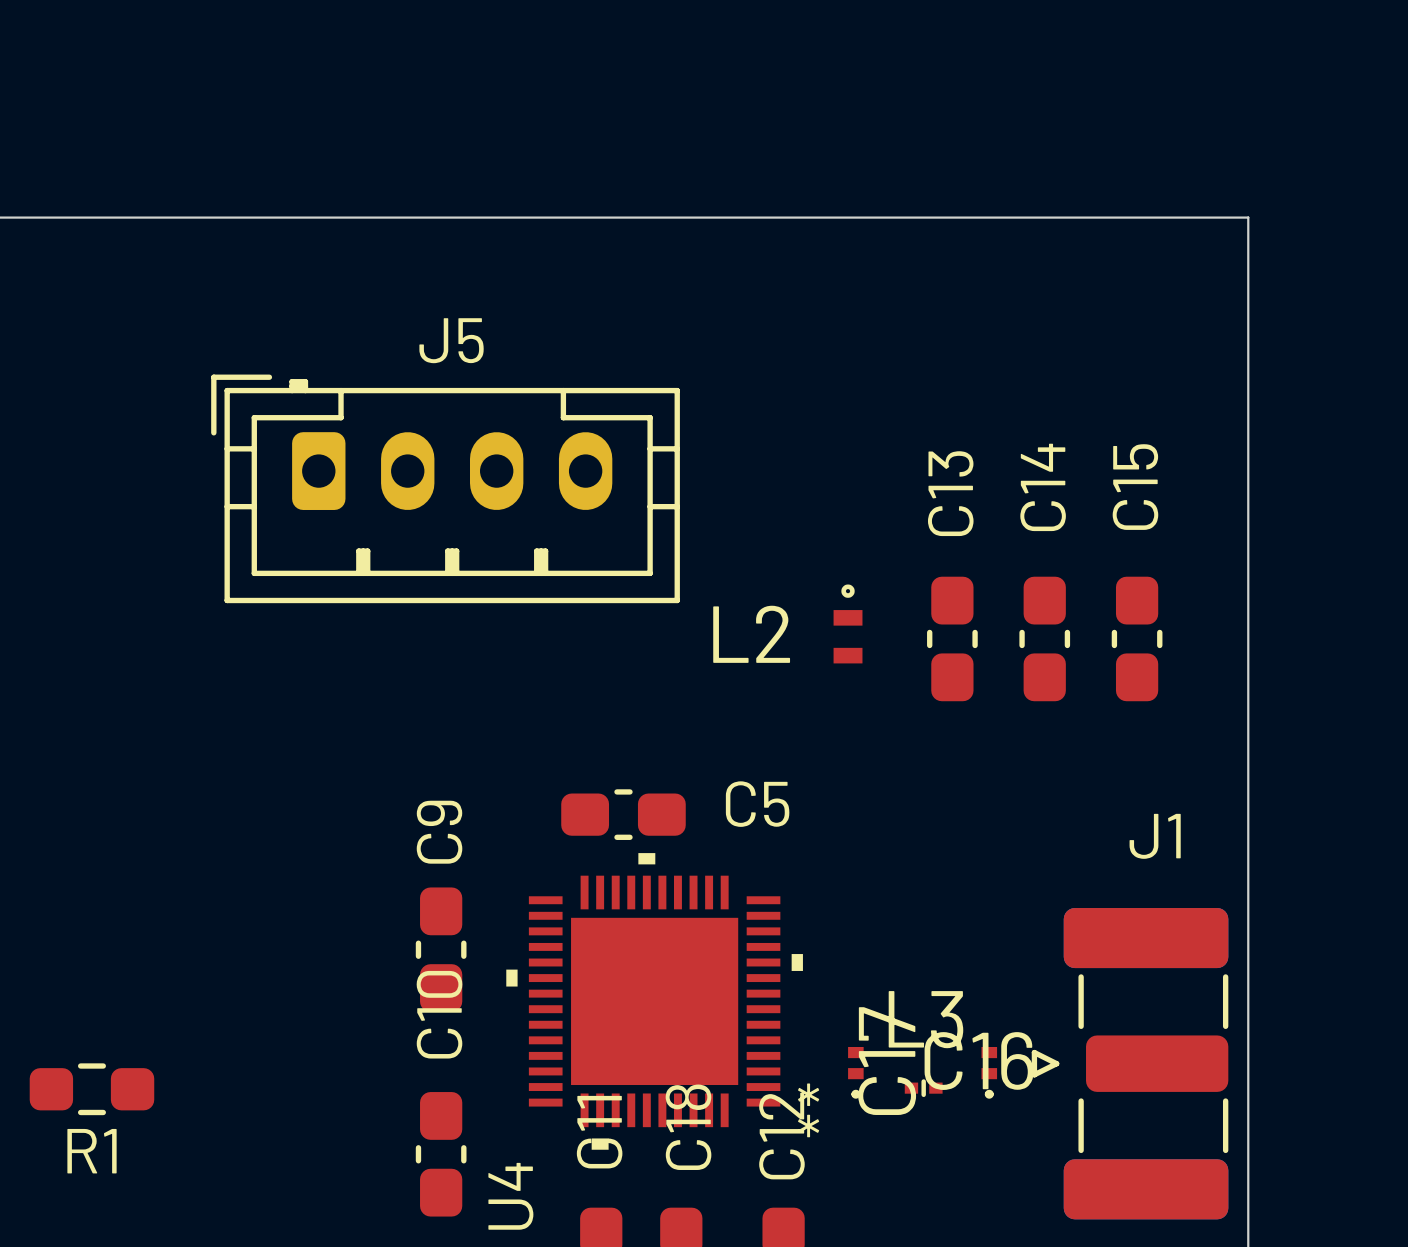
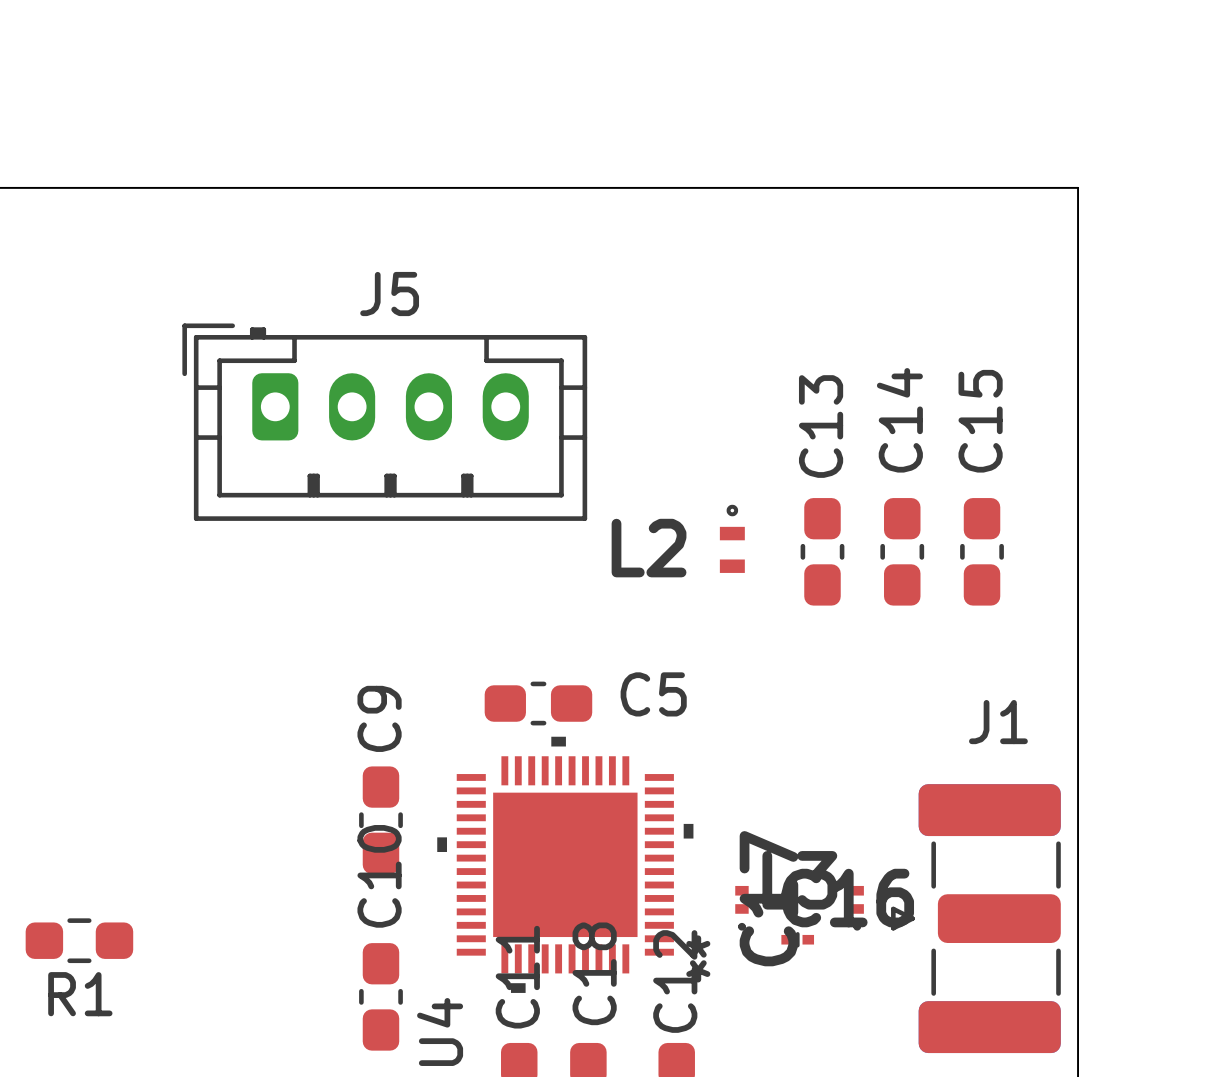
C16 position: (855, 1072) -> (741, 908)
C17 position: (989, 1072) -> (857, 908)

